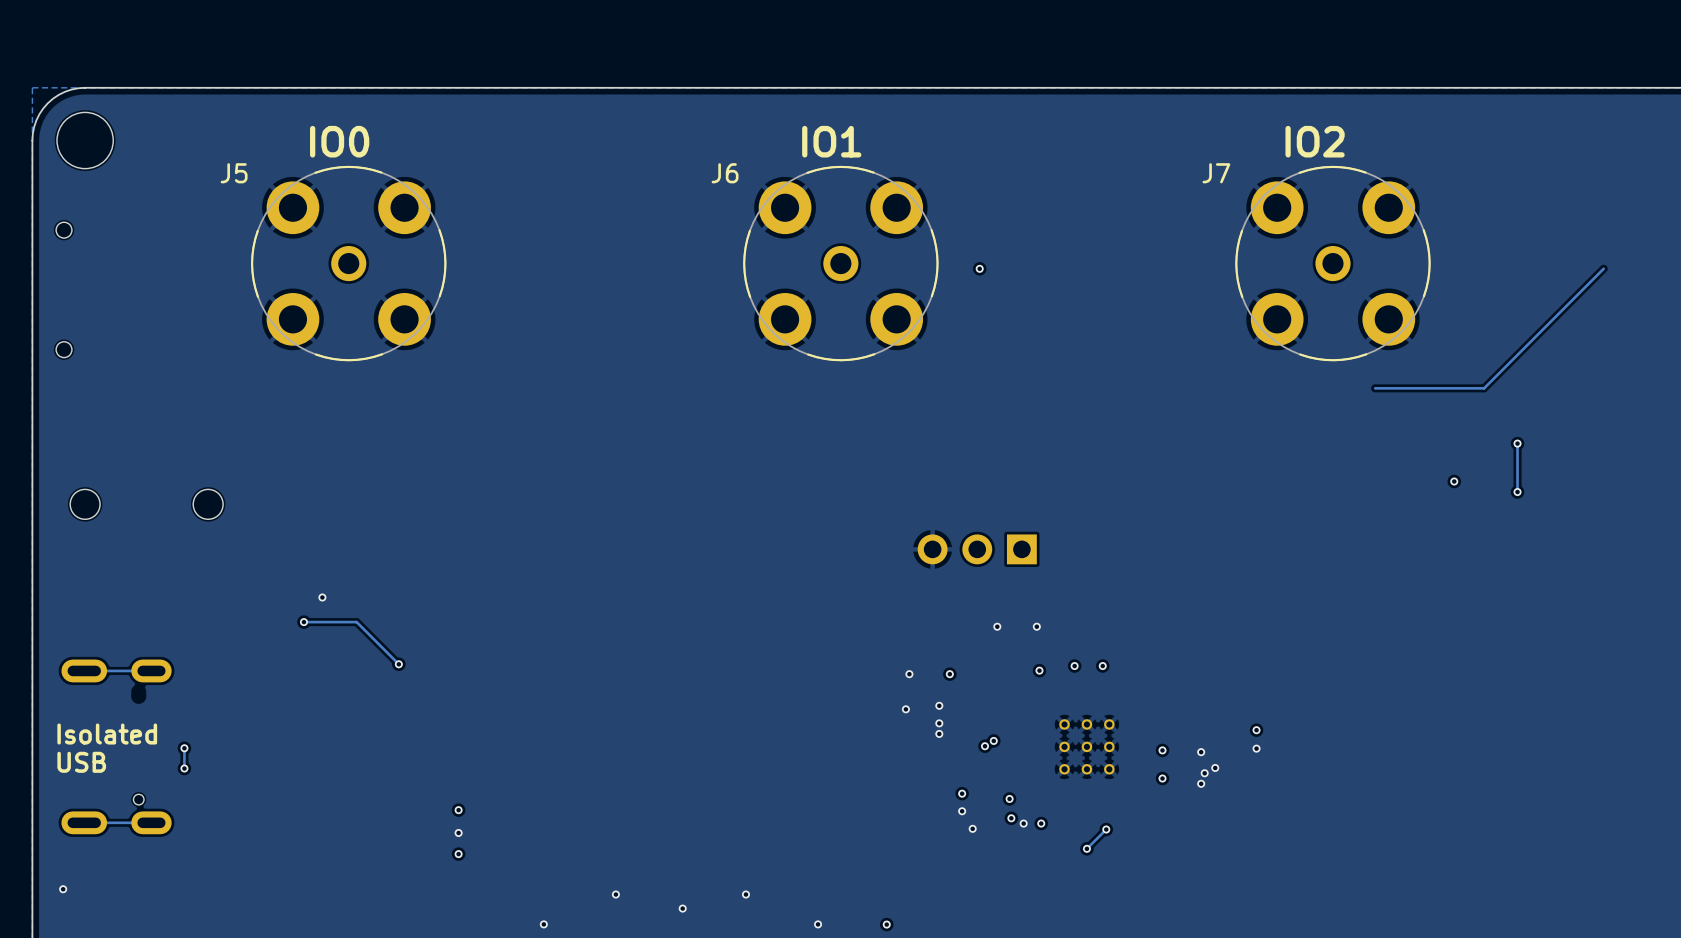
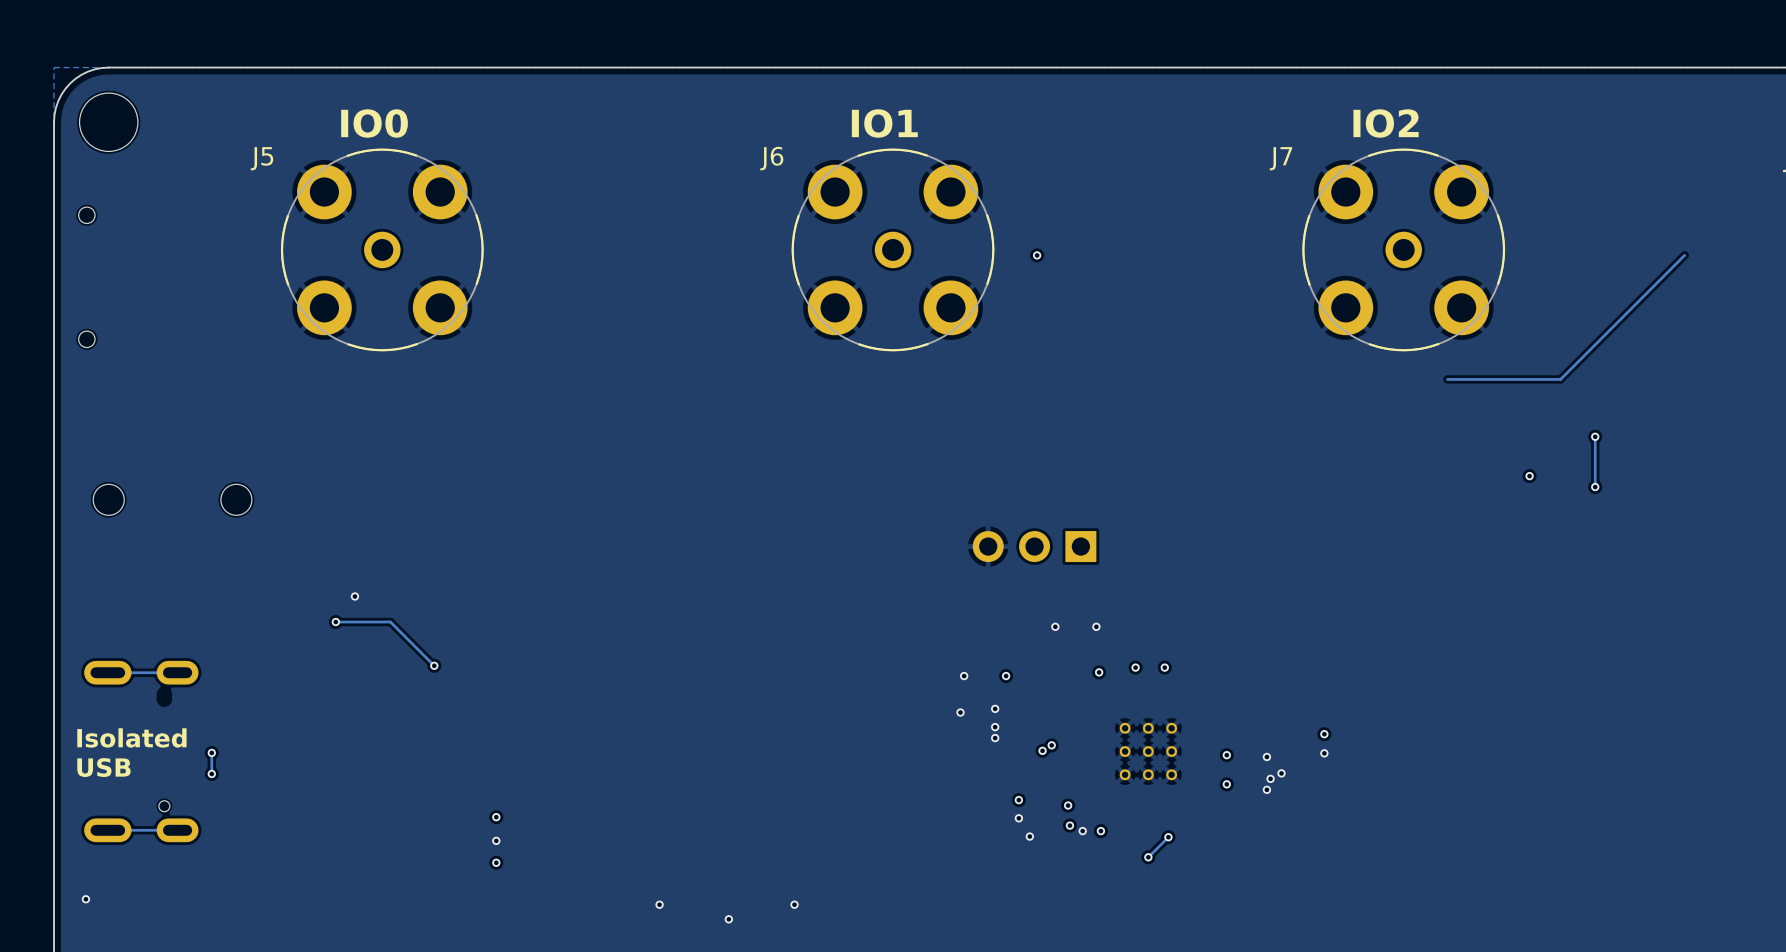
via: (543, 924) -> none
via: (818, 924) -> none
via: (886, 924) -> none

